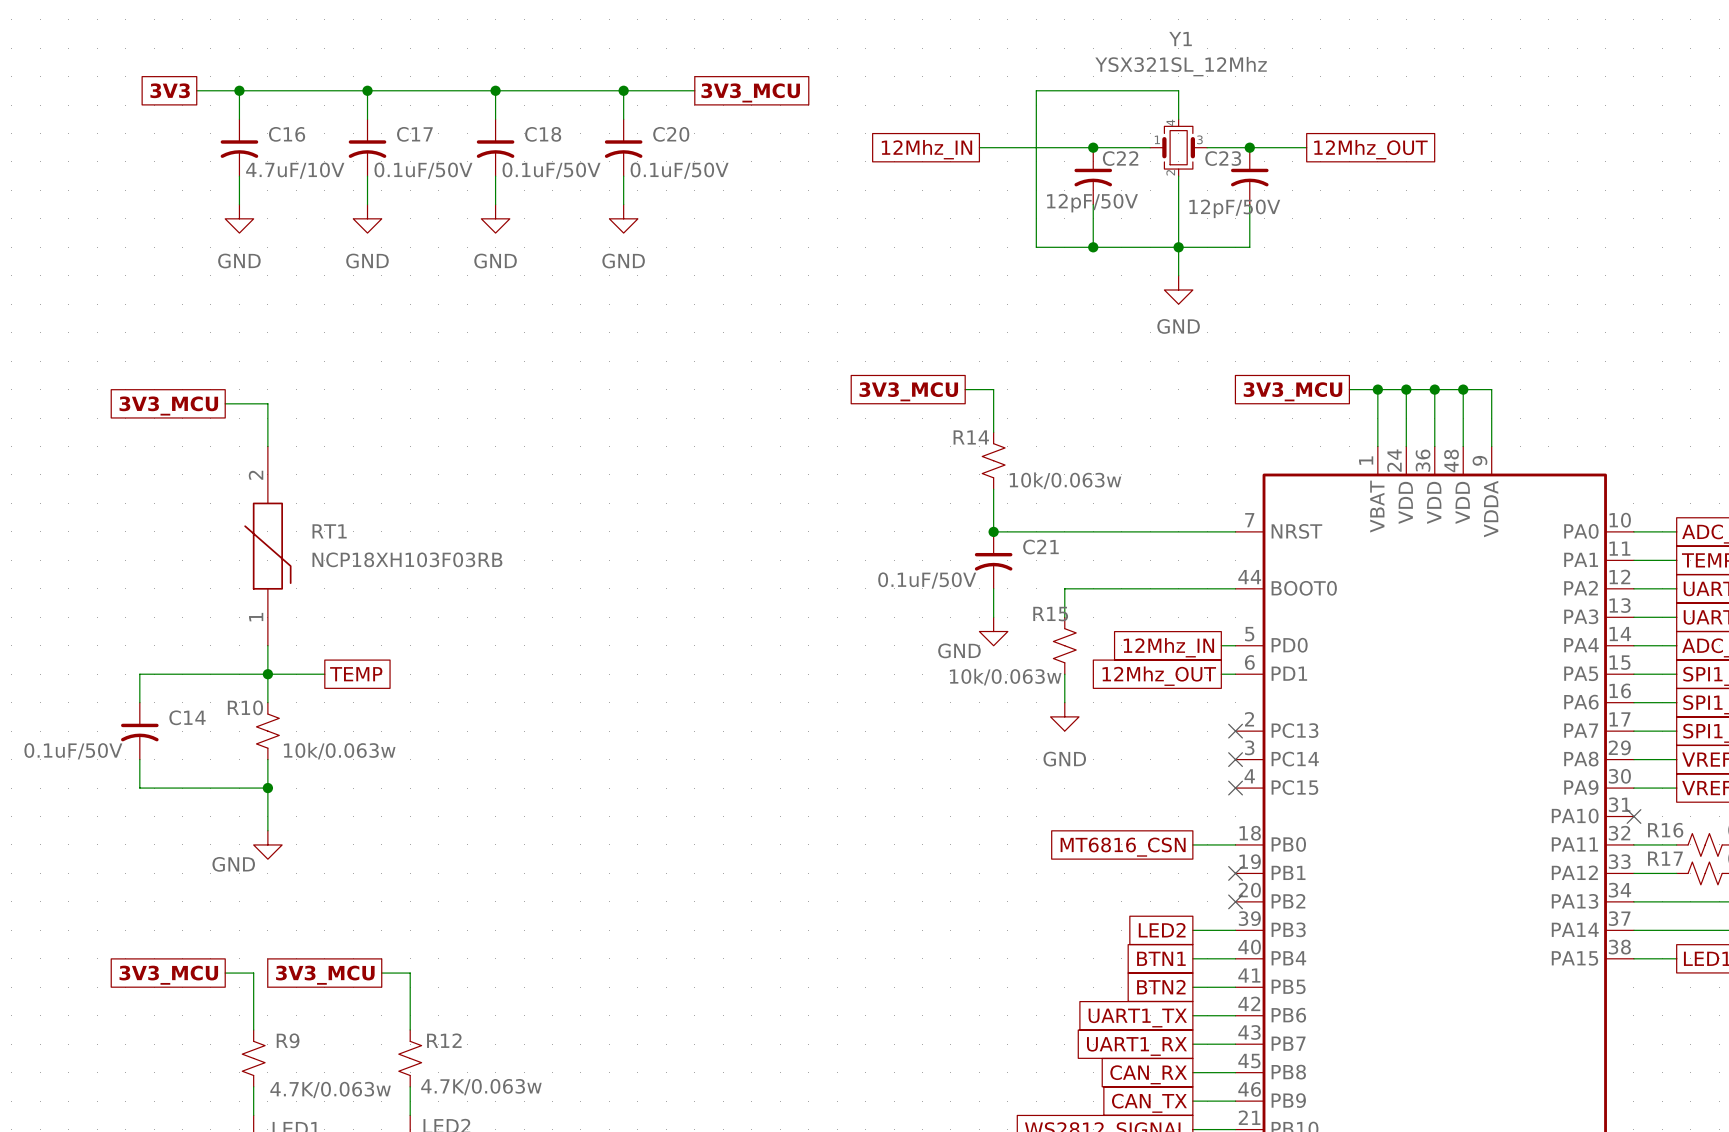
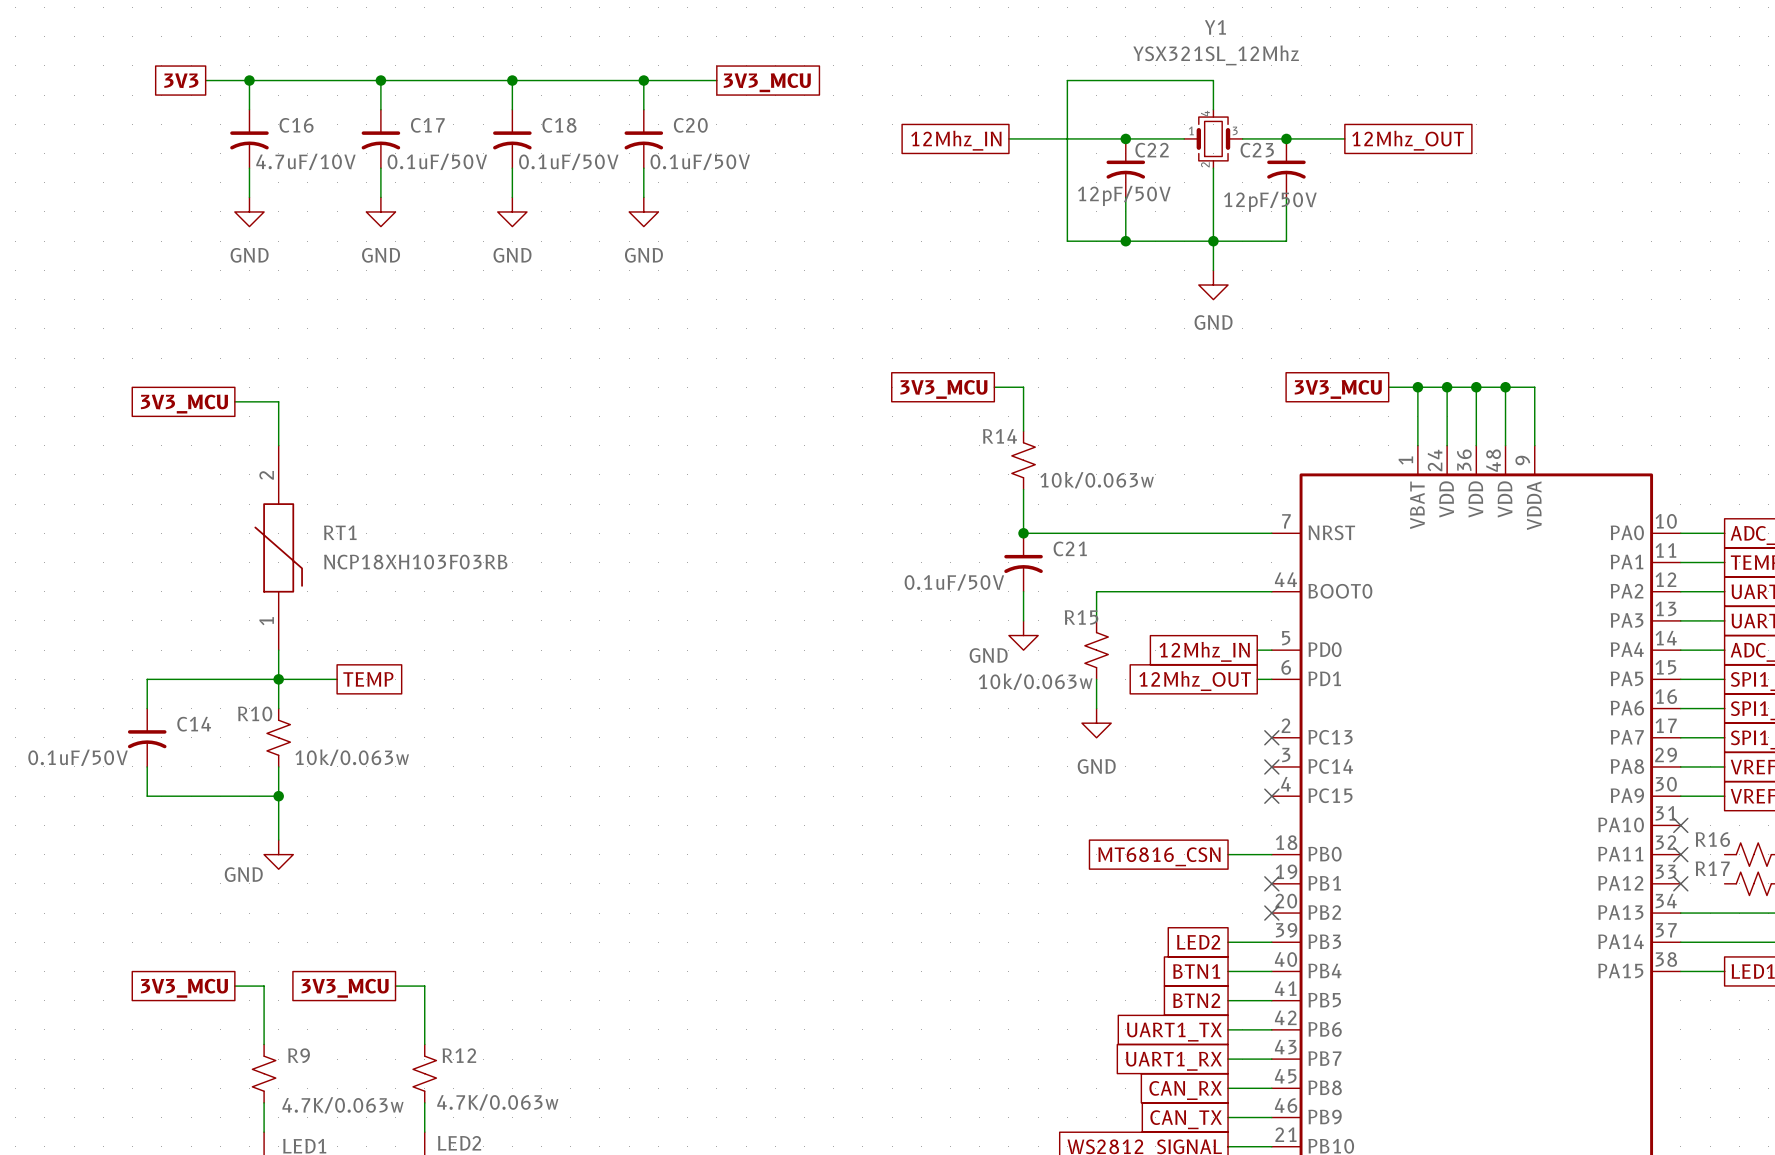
wire: (1633, 844) (1676, 844) -> none
no-connect mark: none -> (1680, 854)
wire: (1633, 873) (1676, 873) -> none
no-connect mark: none -> (1680, 883)

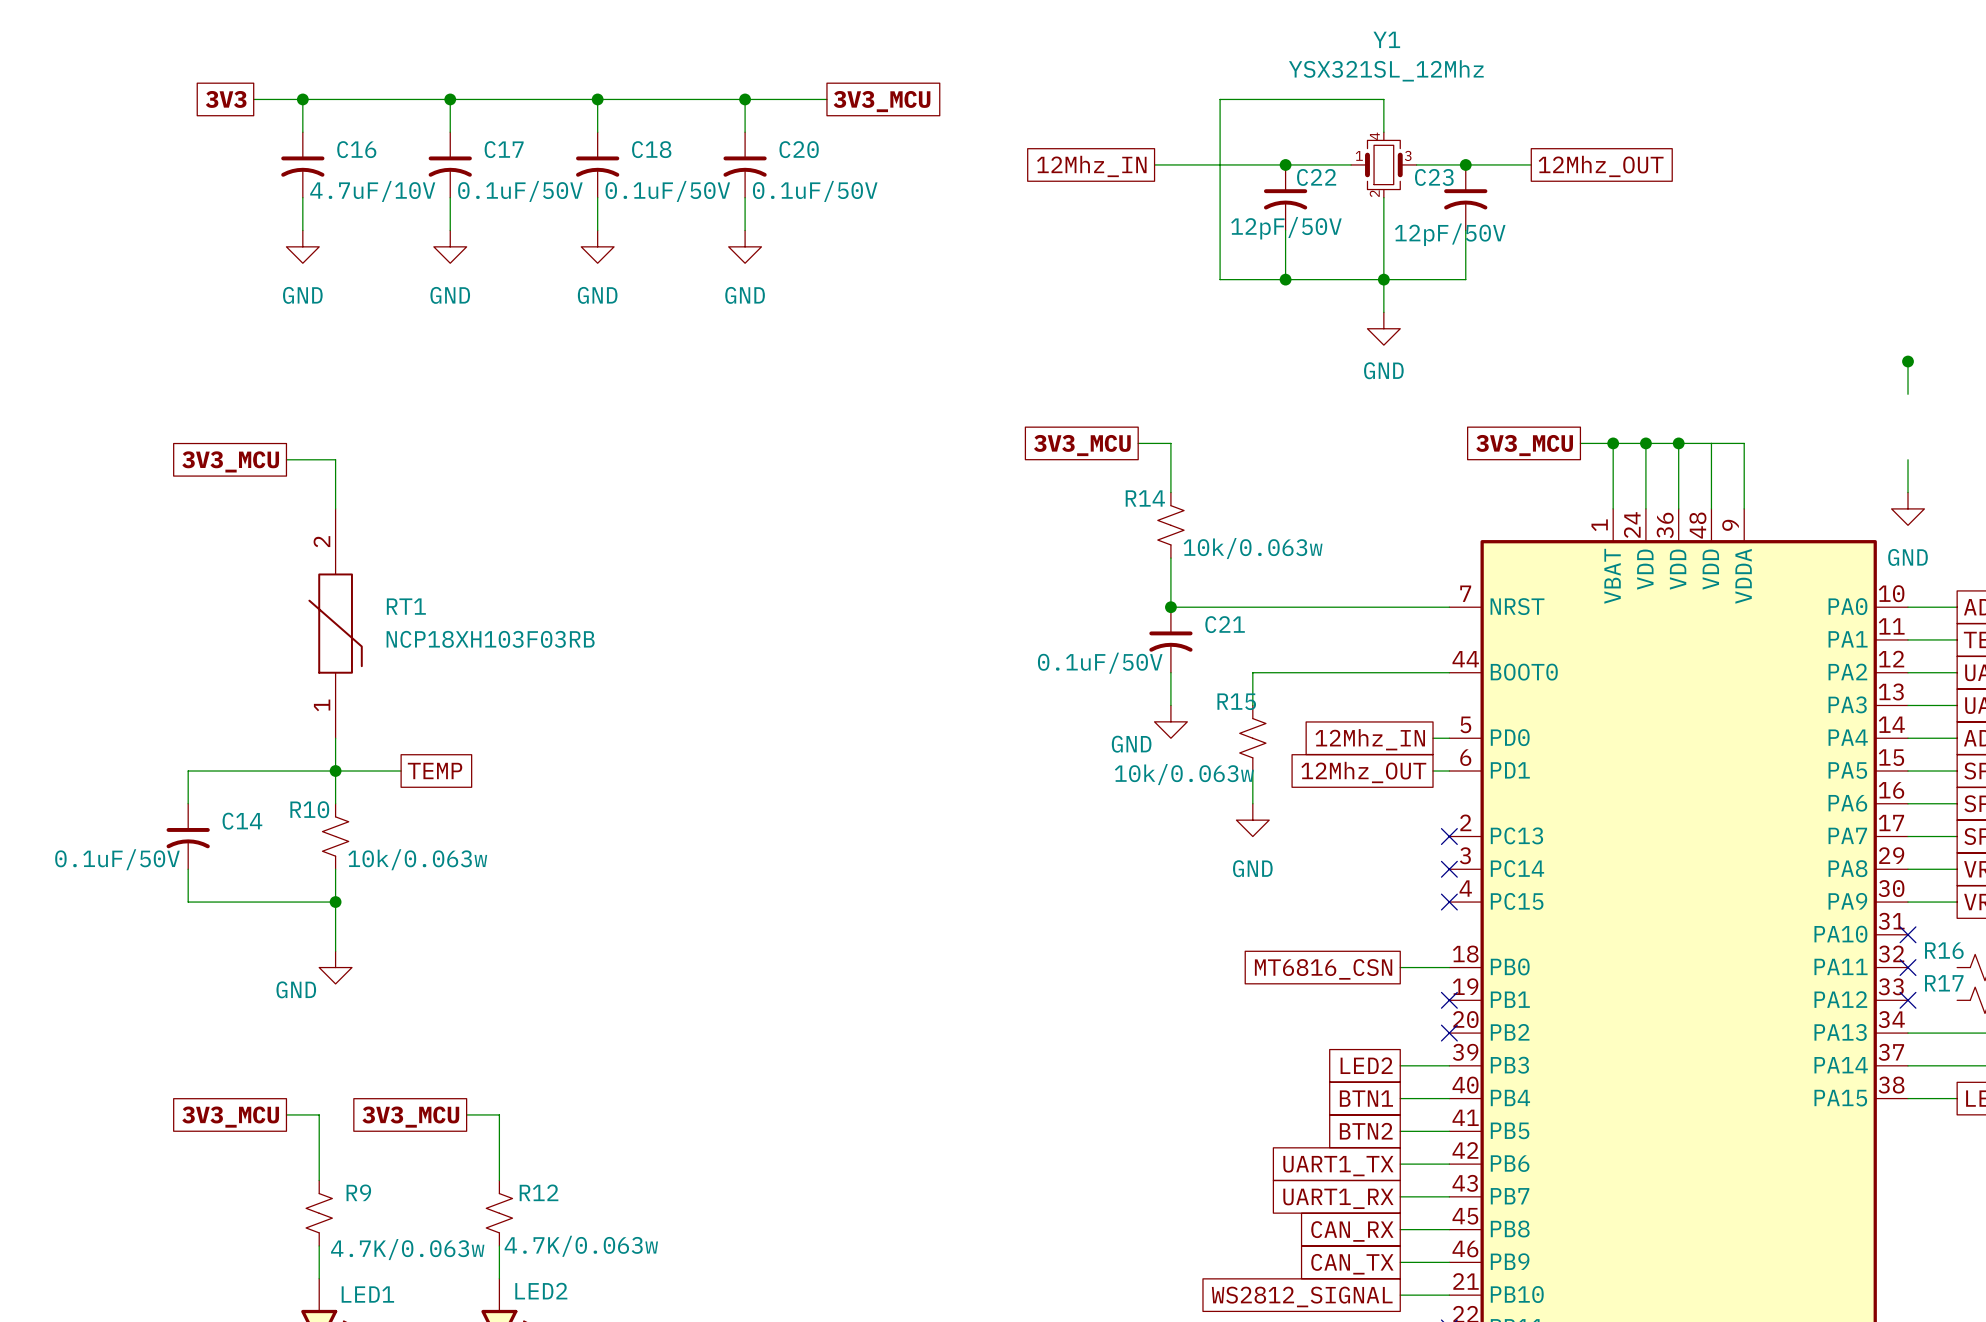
wire: none -> (1908, 361) (1908, 394)
junction: none -> (1908, 361)
junction: (1505, 387) -> none
wire: none -> (1908, 459) (1908, 492)
power symbol: none -> GND (1908, 508)

